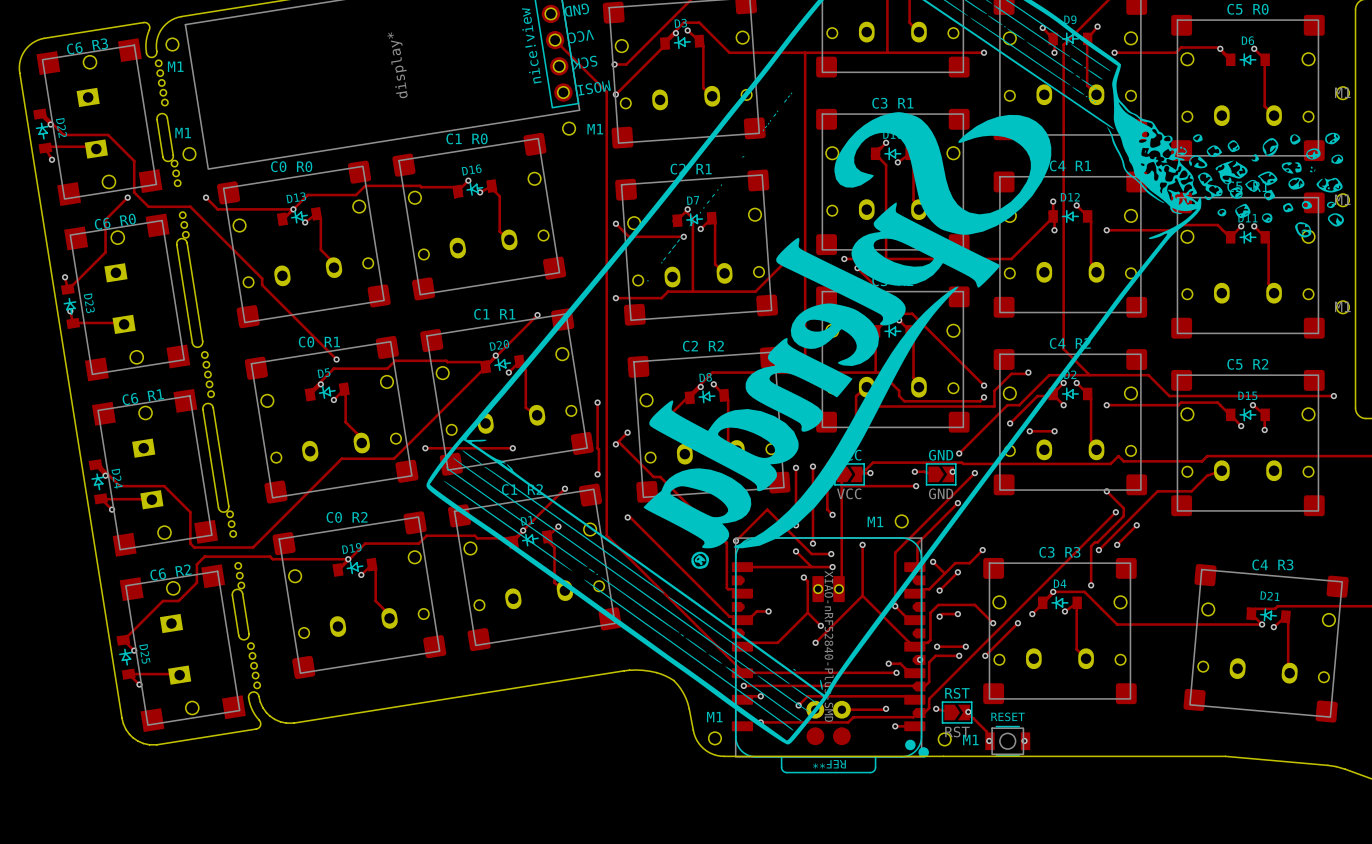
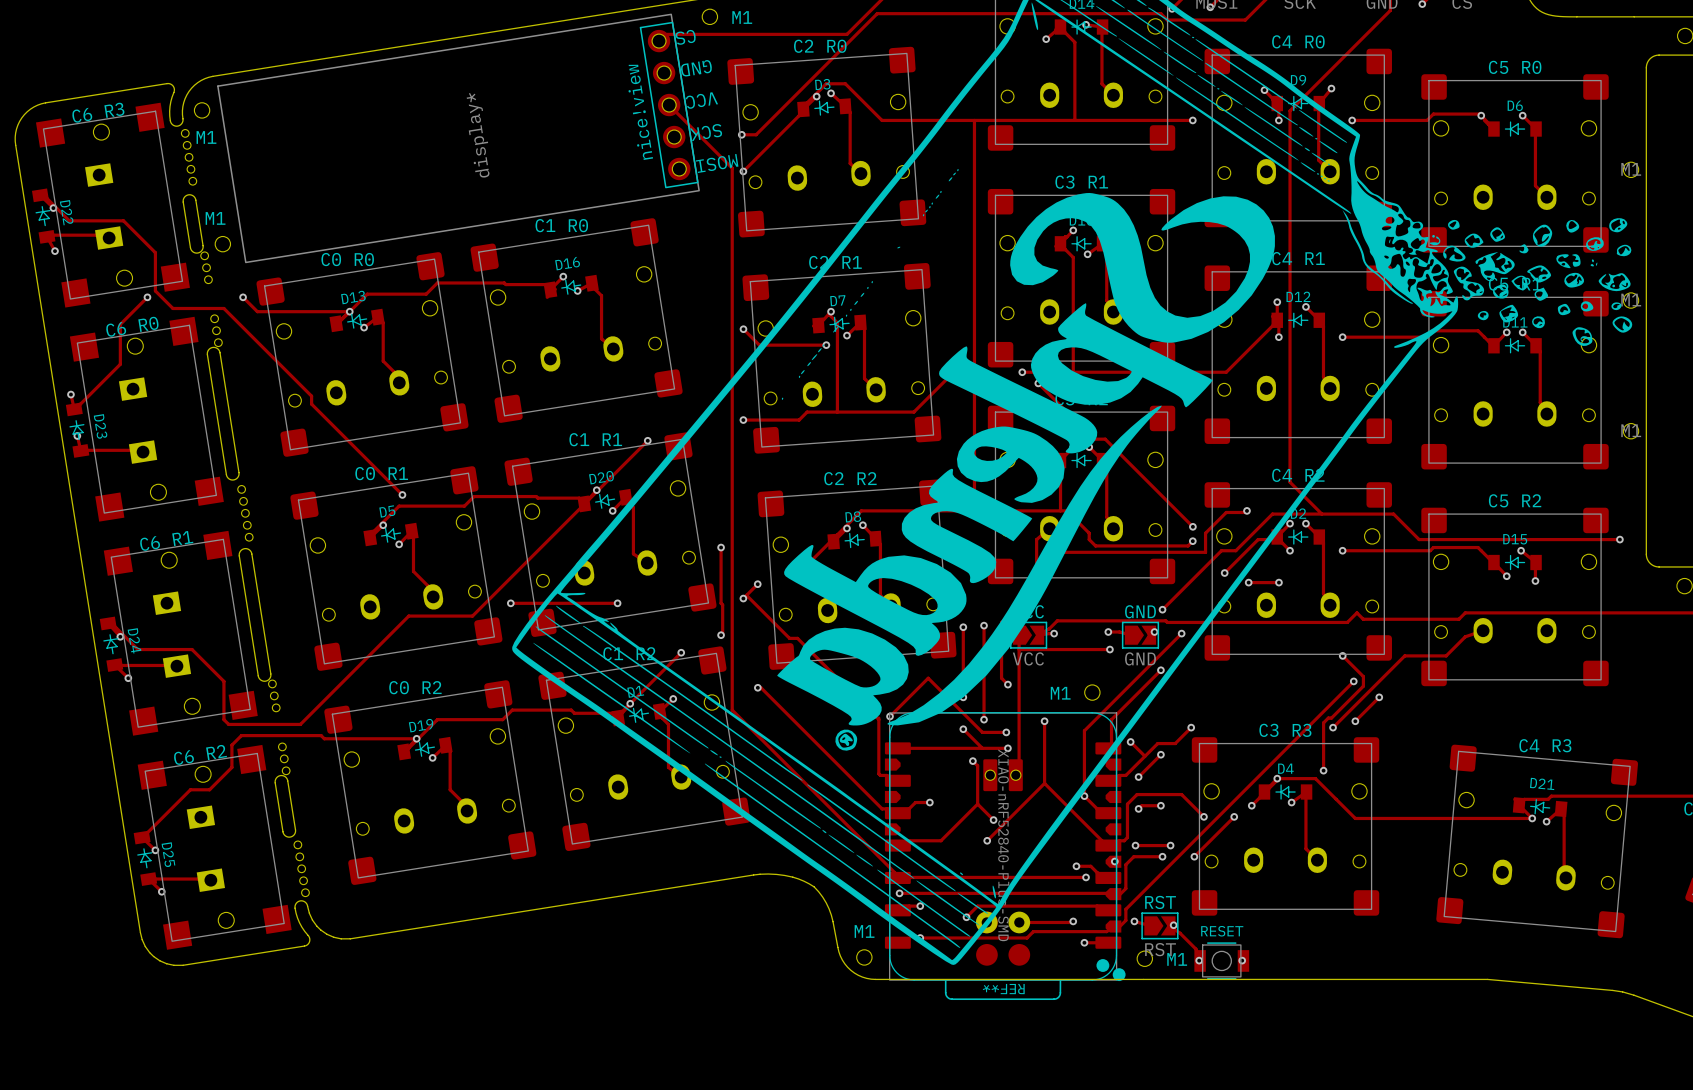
M1: (569, 128) -> none

